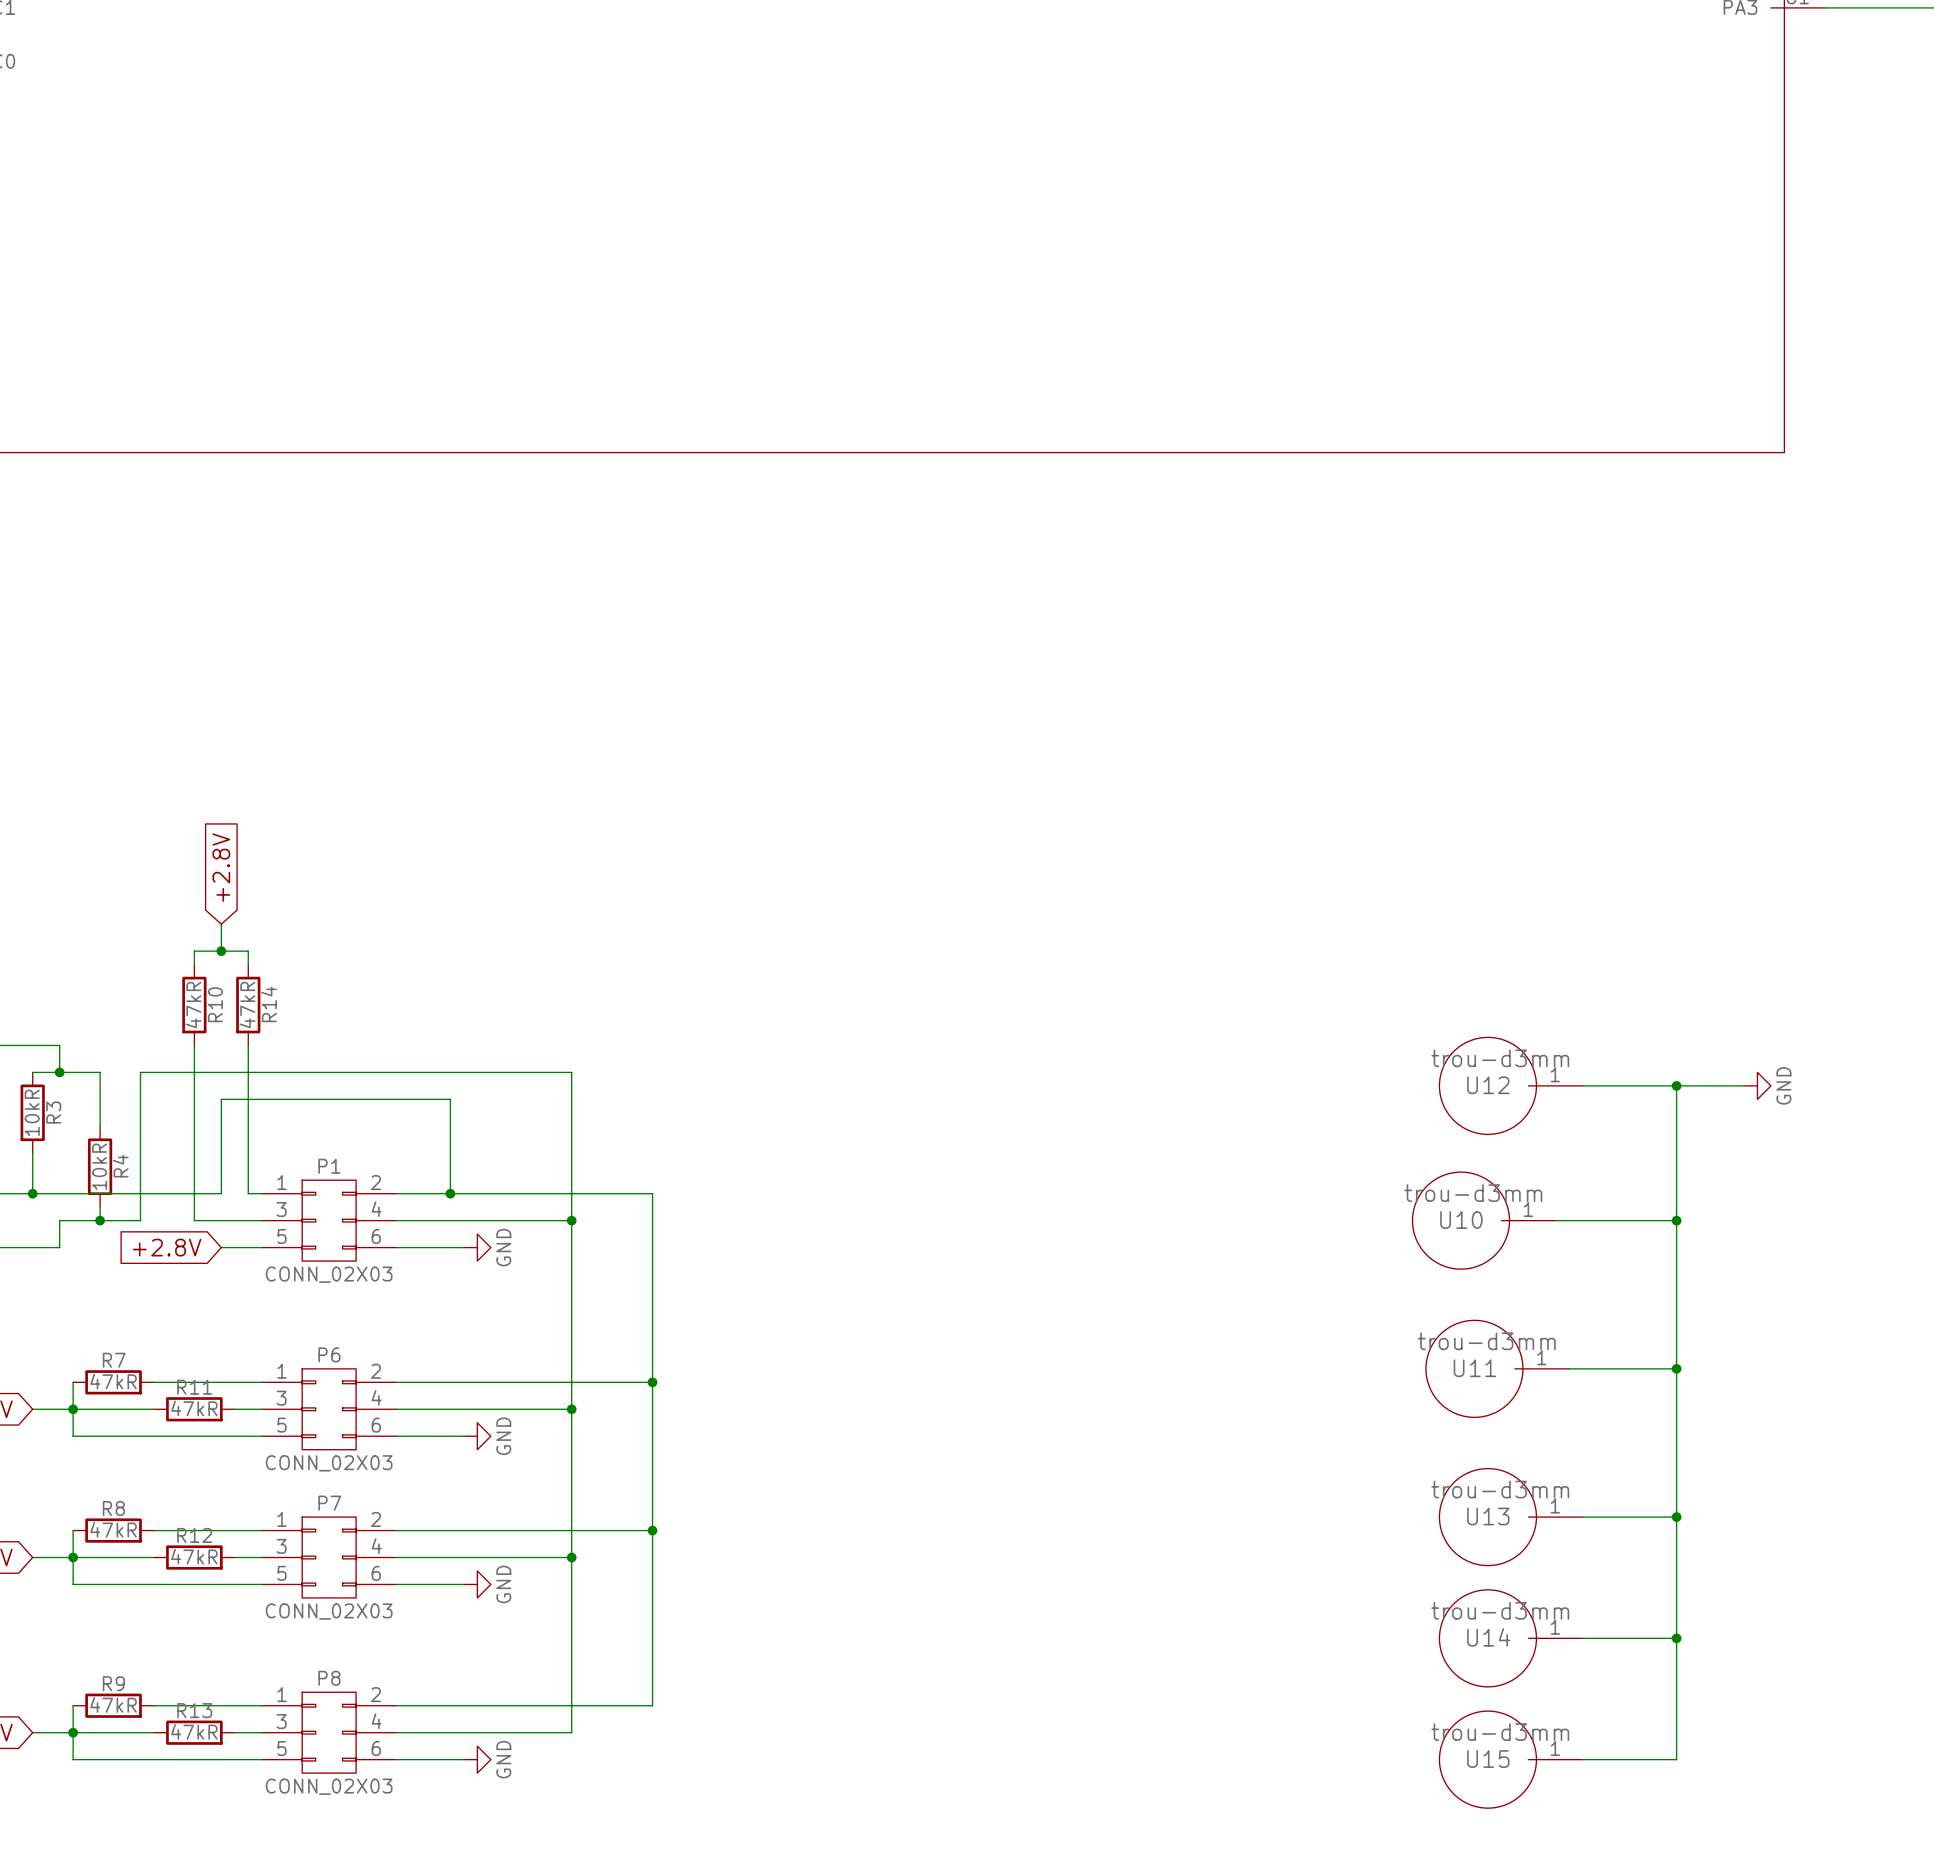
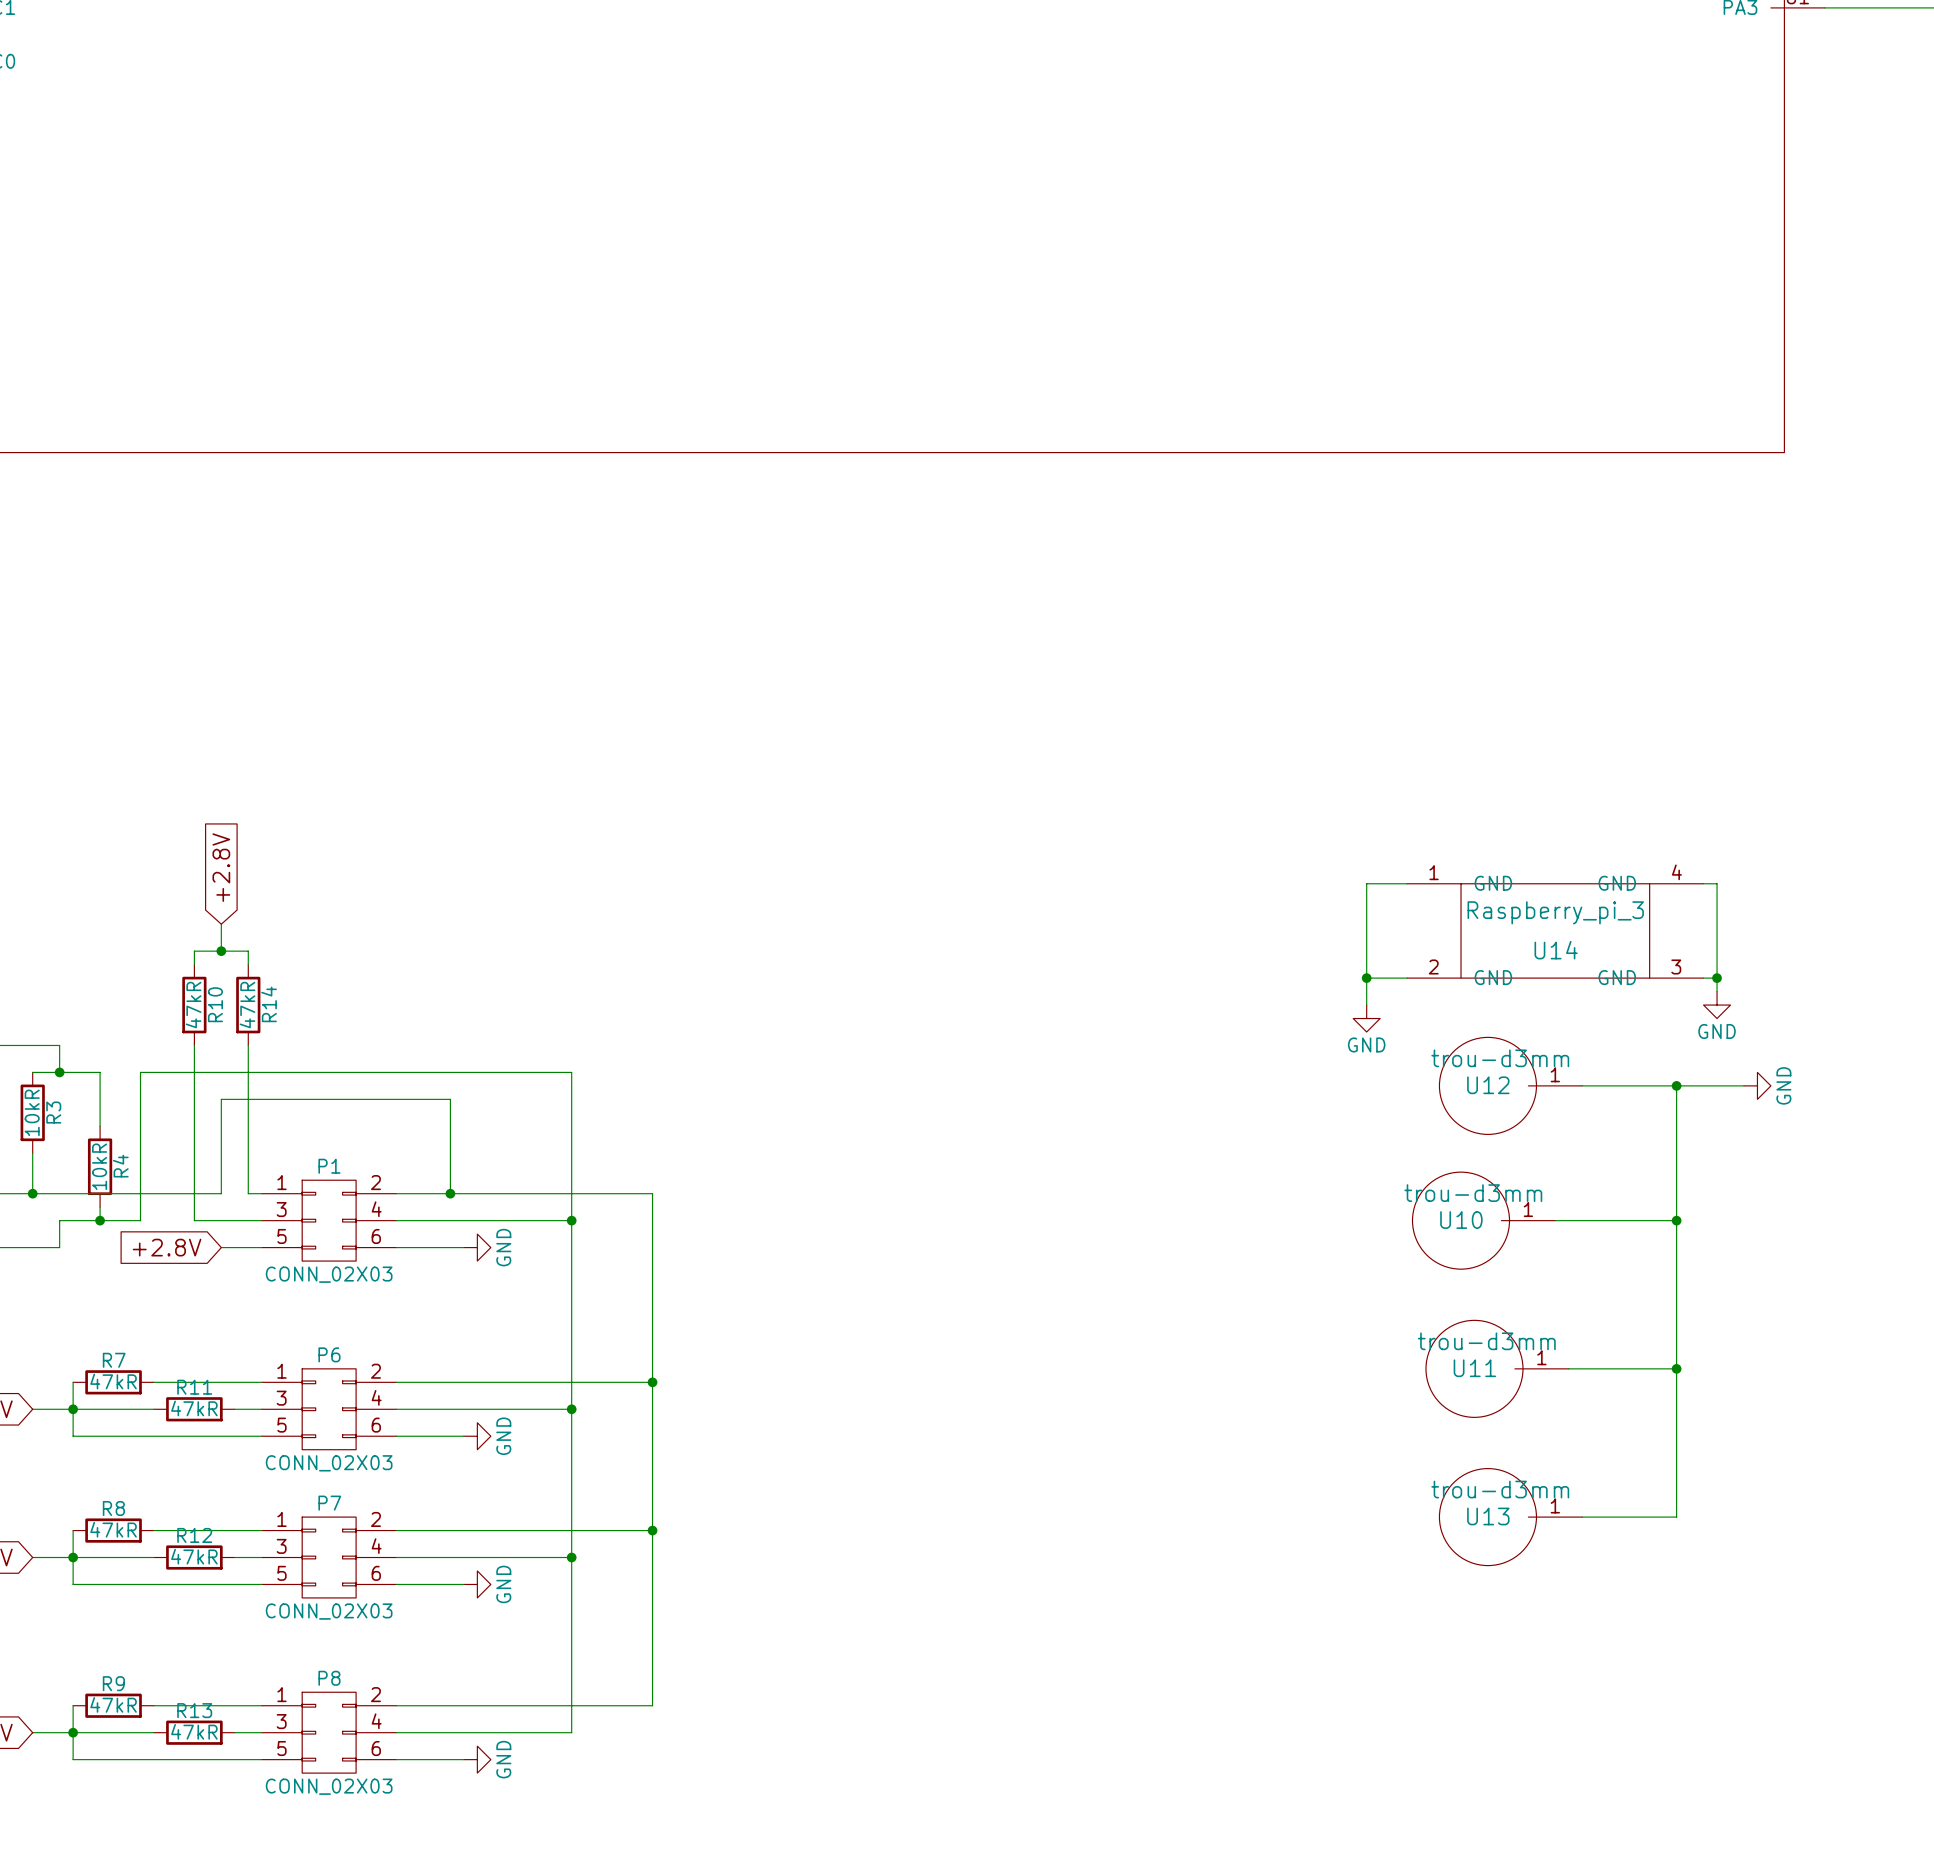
wire: none -> (1407, 883) (1366, 883) (1366, 1005)
wire: none -> (1703, 883) (1717, 883) (1717, 991)
wire: none -> (1366, 978) (1407, 978)
junction: none -> (1366, 978)
wire: none -> (1703, 978) (1717, 978)
junction: none -> (1717, 978)
power symbol: none -> GND (1717, 1005)
power symbol: none -> GND (1366, 1018)
wire: (1676, 1517) (1676, 1759) (1582, 1759) -> none
junction: (1676, 1517) -> none
U14 symbol: [1439, 1589, 1583, 1687] -> [1407, 883, 1704, 979]
U14 value: trou-d3mm (1500, 1610) -> Raspberry_pi_3 (1555, 912)
U14 name position: U14 (1488, 1637) -> U14 (1556, 950)
wire: (1582, 1638) (1676, 1638) -> none
junction: (1676, 1638) -> none
U15: trou-d3mm (1510, 1759) -> none

